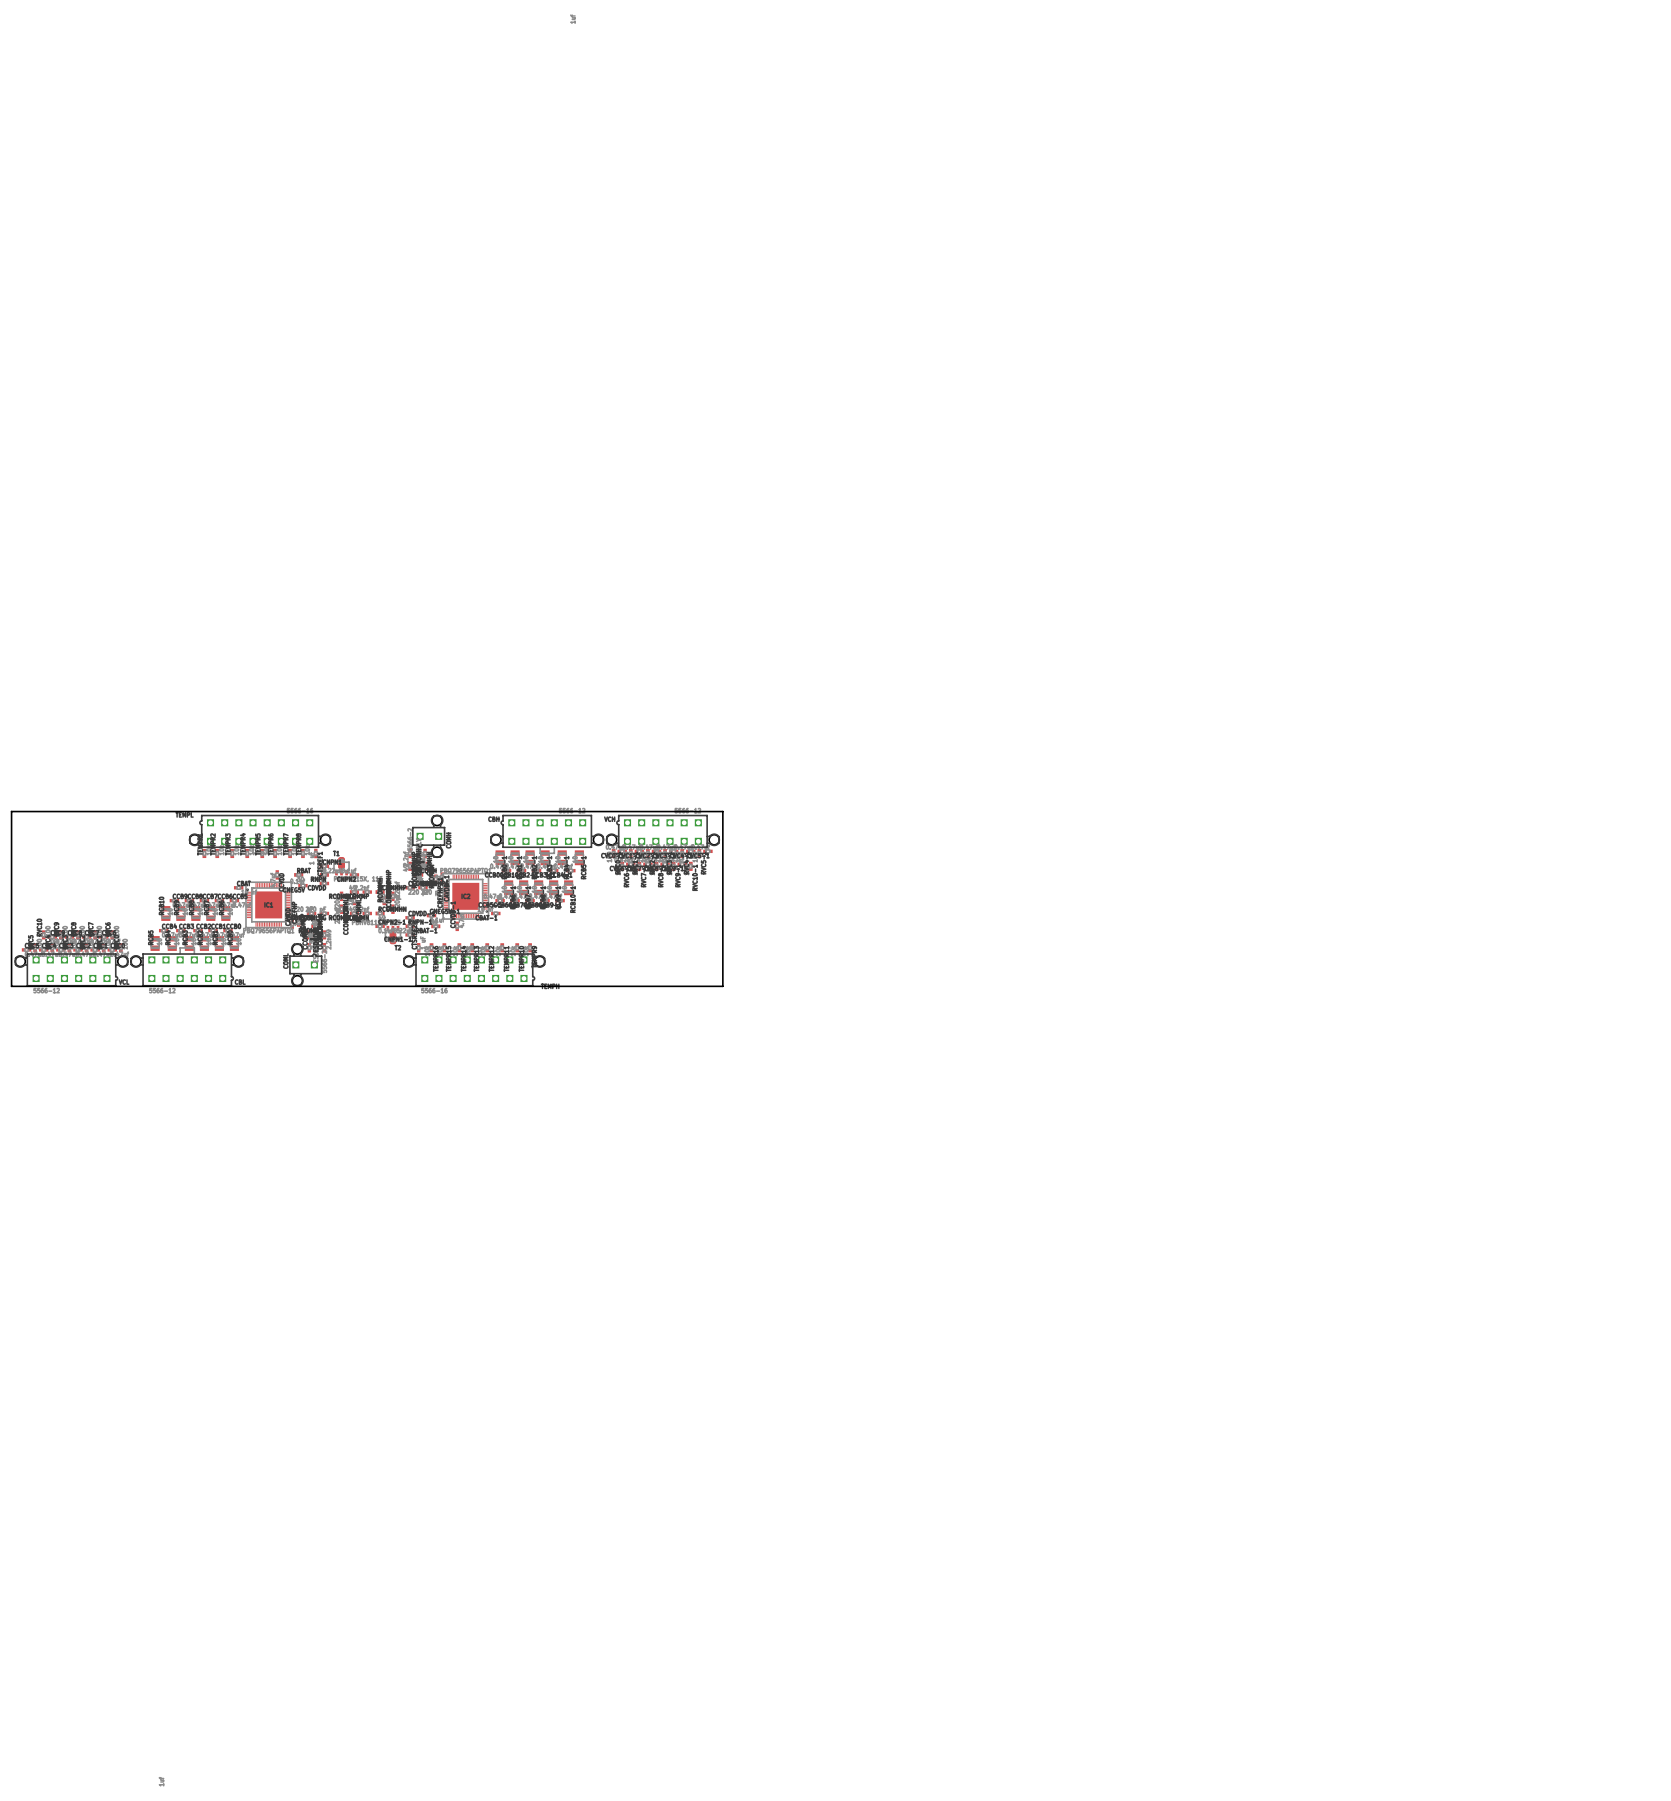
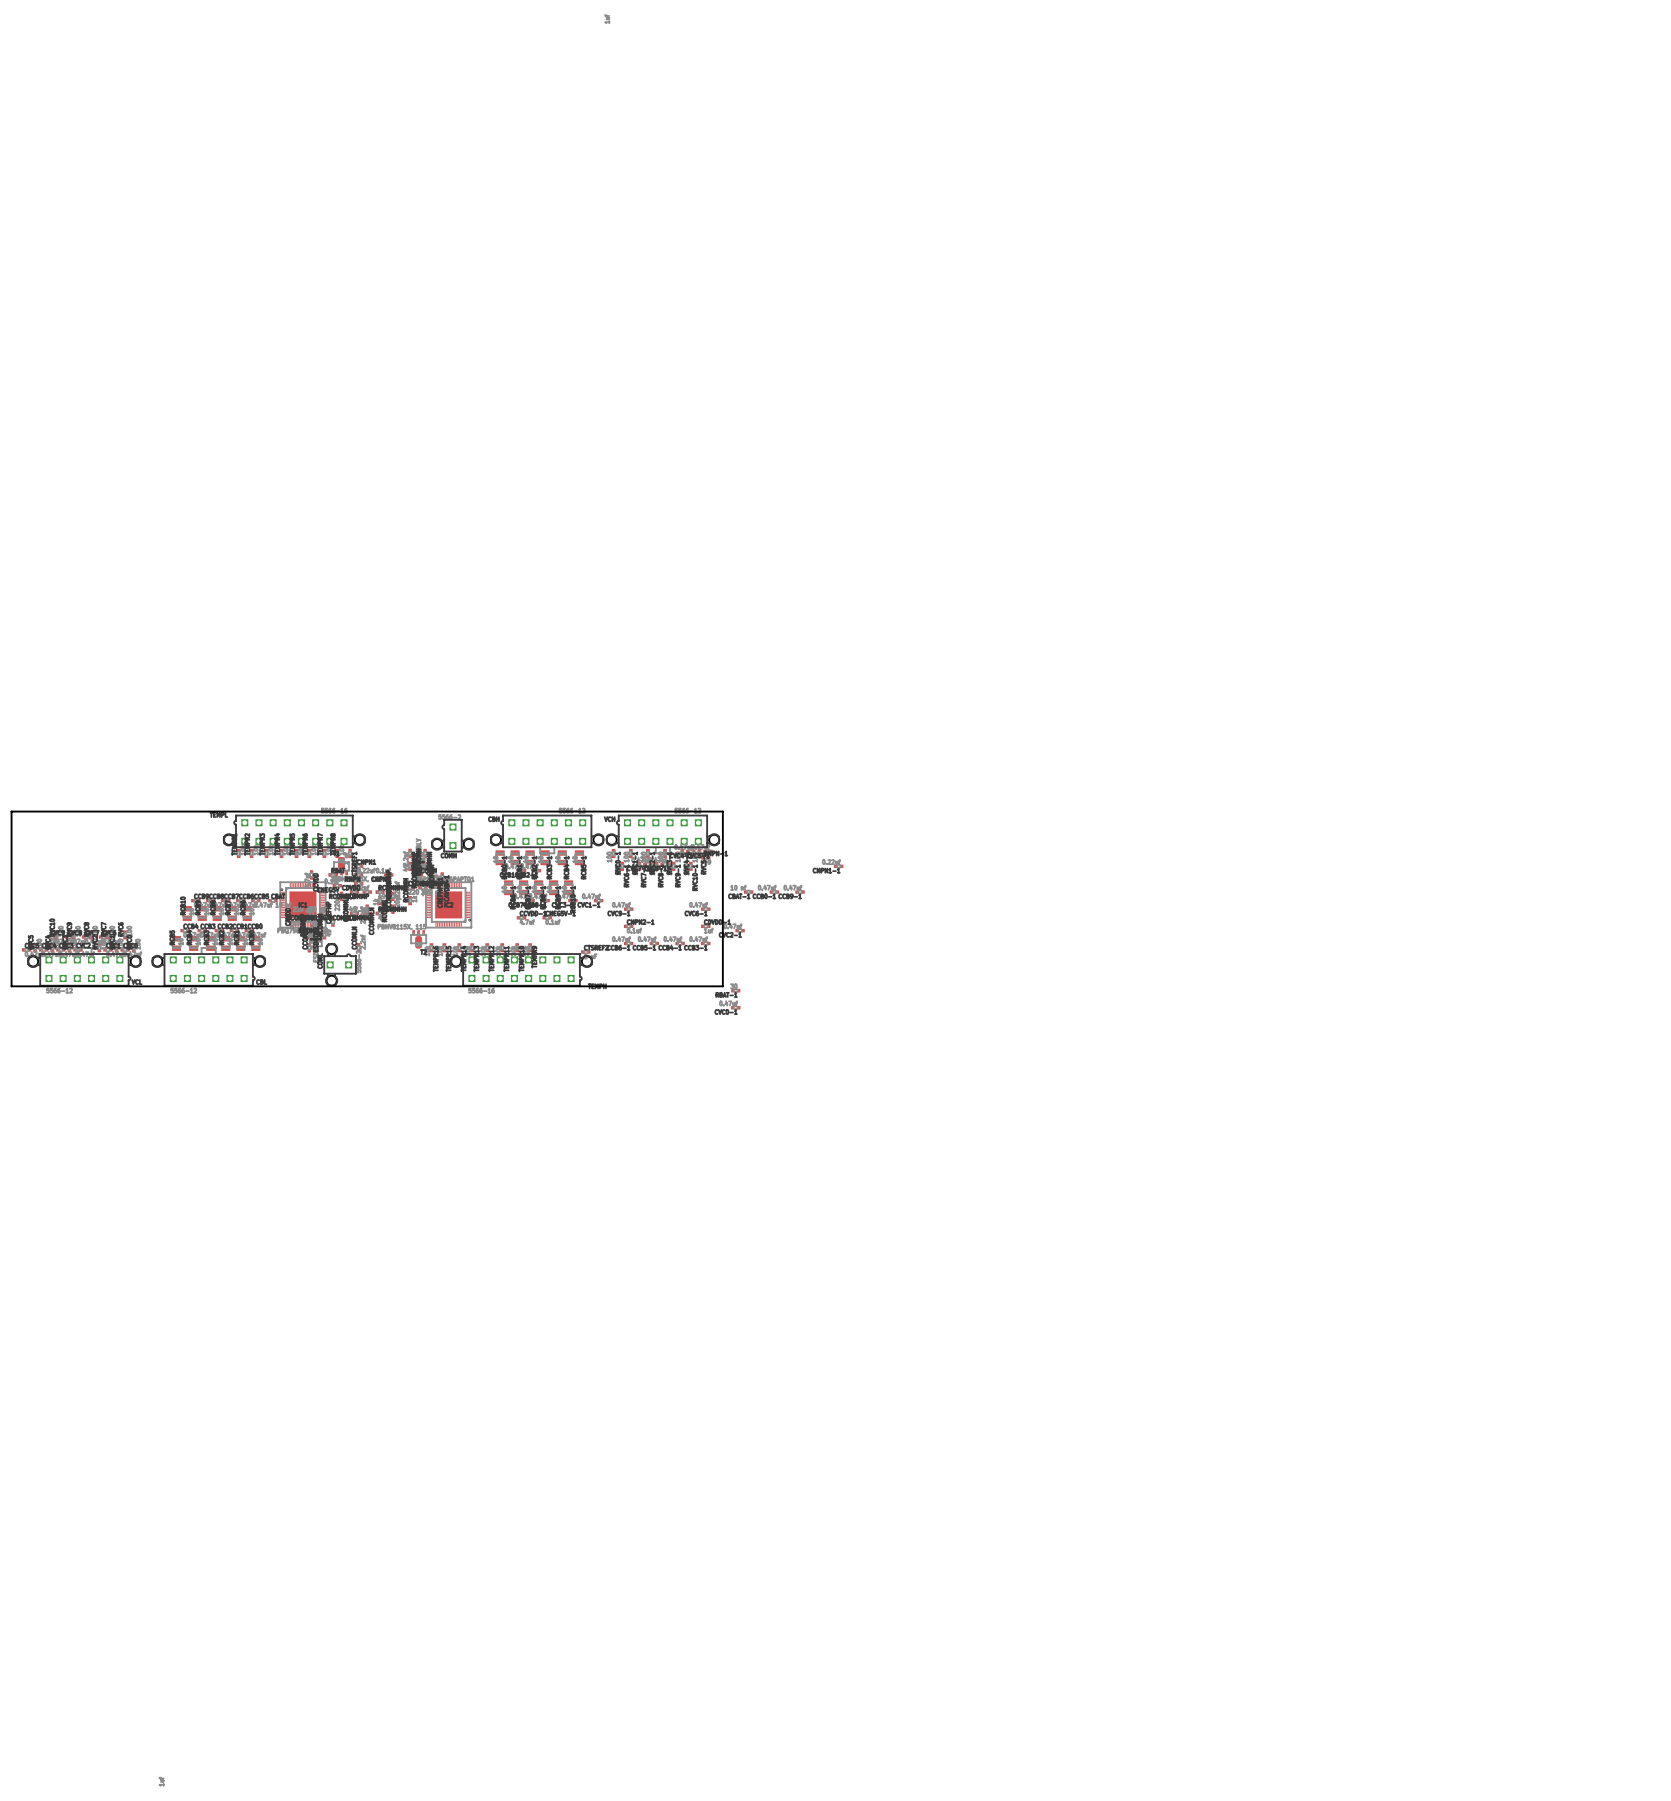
part position: (260, 834) -> (294, 834)
part rotation: 0° (428, 836) -> 90° clockwise (452, 835)
part position: (622, 851) -> (735, 1007)
part position: (639, 851) -> (598, 900)
part position: (656, 851) -> (740, 930)
part position: (673, 851) -> (572, 900)
part position: (204, 853) -> (238, 853)
part position: (217, 853) -> (251, 853)
part position: (232, 853) -> (266, 853)
part position: (247, 853) -> (281, 853)
part position: (262, 853) -> (296, 853)
part position: (275, 853) -> (309, 853)
part position: (290, 853) -> (324, 853)
part position: (302, 853) -> (337, 853)
part position: (315, 853) -> (350, 853)
part position: (630, 864) -> (705, 909)
part position: (682, 864) -> (628, 909)
part position: (324, 866) -> (358, 866)
part position: (506, 870) -> (774, 892)
part position: (553, 870) -> (705, 943)
part position: (570, 870) -> (680, 943)
part position: (277, 874) -> (311, 874)
part position: (298, 874) -> (332, 874)
part position: (324, 874) -> (358, 874)
part position: (354, 874) -> (388, 874)
part position: (324, 883) -> (358, 883)
part position: (302, 885) -> (337, 885)
part position: (238, 887) -> (272, 900)
part position: (465, 896) -> (448, 904)
part position: (174, 900) -> (195, 900)
part position: (189, 900) -> (210, 900)
part position: (204, 900) -> (225, 900)
part position: (219, 900) -> (240, 900)
part position: (234, 900) -> (255, 900)
part position: (354, 900) -> (380, 900)
part position: (384, 900) -> (410, 900)
part position: (500, 900) -> (654, 943)
part position: (515, 900) -> (628, 943)
part position: (560, 900) -> (800, 892)
part position: (268, 904) -> (302, 904)
part position: (341, 909) -> (367, 909)
part position: (165, 913) -> (187, 913)
part position: (180, 913) -> (202, 913)
part position: (195, 913) -> (217, 913)
part position: (210, 913) -> (232, 913)
part position: (225, 913) -> (247, 913)
part position: (495, 913) -> (748, 892)
part position: (431, 915) -> (547, 917)
part position: (410, 917) -> (705, 926)
part position: (298, 922) -> (332, 922)
part position: (380, 926) -> (628, 926)
part position: (410, 926) -> (705, 857)
part position: (435, 926) -> (735, 990)
part rotation: 0° (457, 926) -> 90° clockwise (521, 917)
part position: (457, 926) -> (521, 917)
part position: (163, 930) -> (185, 930)
part position: (180, 930) -> (202, 930)
part position: (197, 930) -> (219, 930)
part position: (212, 930) -> (234, 930)
part position: (227, 930) -> (249, 930)
part position: (43, 934) -> (56, 934)
part position: (60, 934) -> (73, 934)
part position: (77, 934) -> (90, 934)
part position: (95, 934) -> (107, 934)
part position: (112, 934) -> (125, 934)
part position: (410, 934) -> (838, 866)
part position: (392, 935) -> (418, 939)
part position: (155, 943) -> (176, 943)
part position: (172, 943) -> (193, 943)
part position: (189, 943) -> (210, 943)
part position: (204, 943) -> (225, 943)
part position: (219, 943) -> (240, 943)
part position: (234, 943) -> (255, 943)
part position: (86, 947) -> (99, 947)
part position: (103, 947) -> (116, 947)
part position: (120, 947) -> (133, 947)
part position: (324, 947) -> (358, 947)
part rotation: 0° (418, 947) -> 90° clockwise (585, 952)
part position: (418, 947) -> (585, 952)
part position: (95, 949) -> (107, 949)
part position: (112, 949) -> (125, 949)
part position: (305, 964) -> (340, 964)
part position: (71, 966) -> (84, 966)
part position: (187, 966) -> (208, 966)
part position: (474, 966) -> (521, 966)

